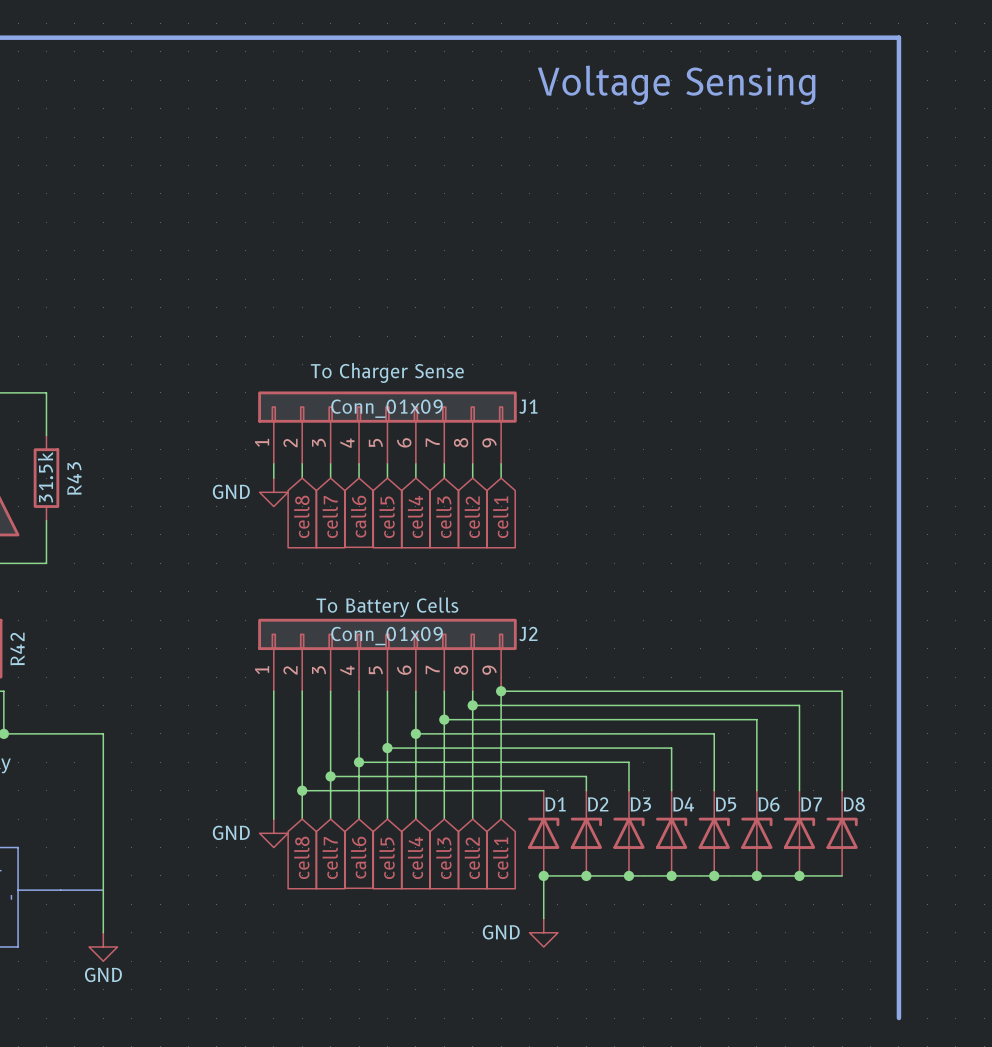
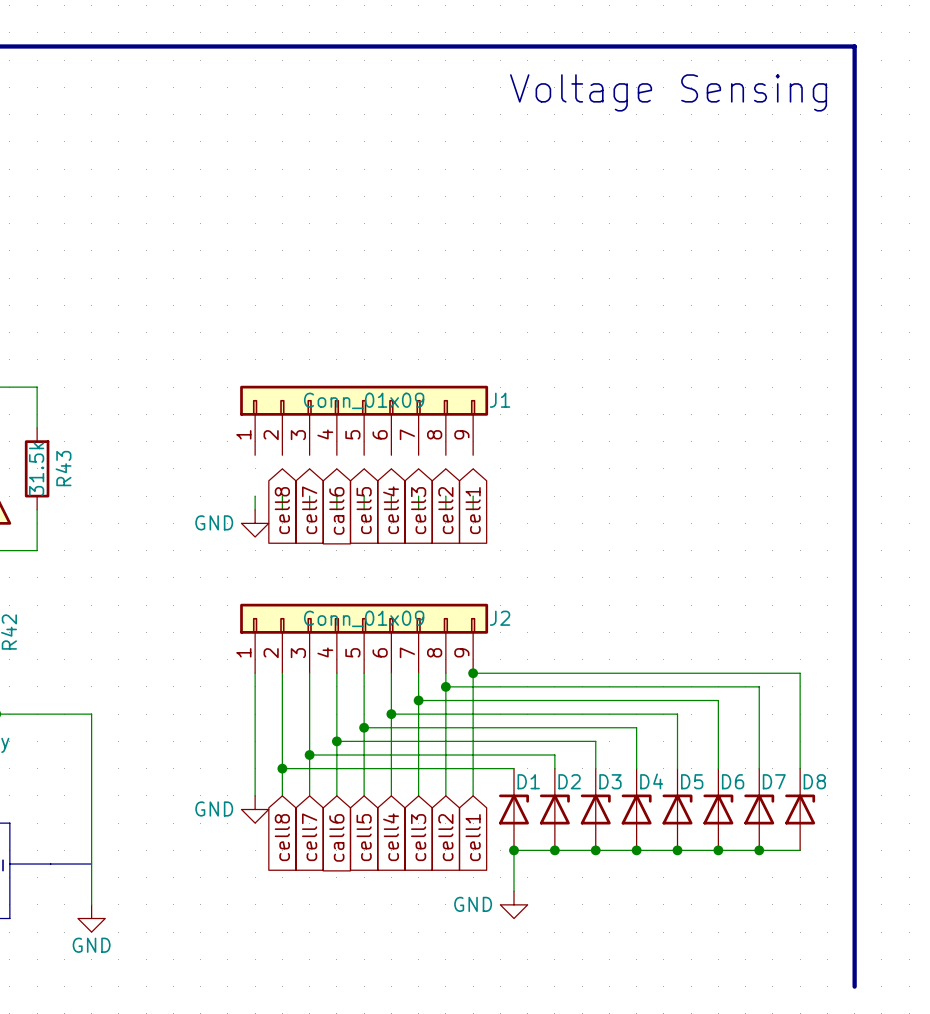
J1 text: To Charger Sense (387, 372) -> none
wire: (273, 463) (273, 478) -> (255, 496) (255, 509)
wire: (302, 463) (302, 478) -> (282, 496) (282, 509)
wire: (330, 463) (330, 478) -> (309, 496) (309, 509)
wire: (359, 463) (359, 478) -> (336, 496) (336, 509)
wire: (387, 463) (387, 478) -> (364, 496) (364, 509)
wire: (415, 463) (415, 478) -> (391, 496) (391, 509)
wire: (444, 463) (444, 478) -> (418, 496) (418, 509)
wire: (472, 463) (472, 478) -> (445, 496) (445, 509)
wire: (501, 463) (501, 478) -> (473, 496) (473, 509)
power symbol position: GND (273, 492) -> GND (255, 523)
J2 text: To Battery Cells (387, 607) -> none

